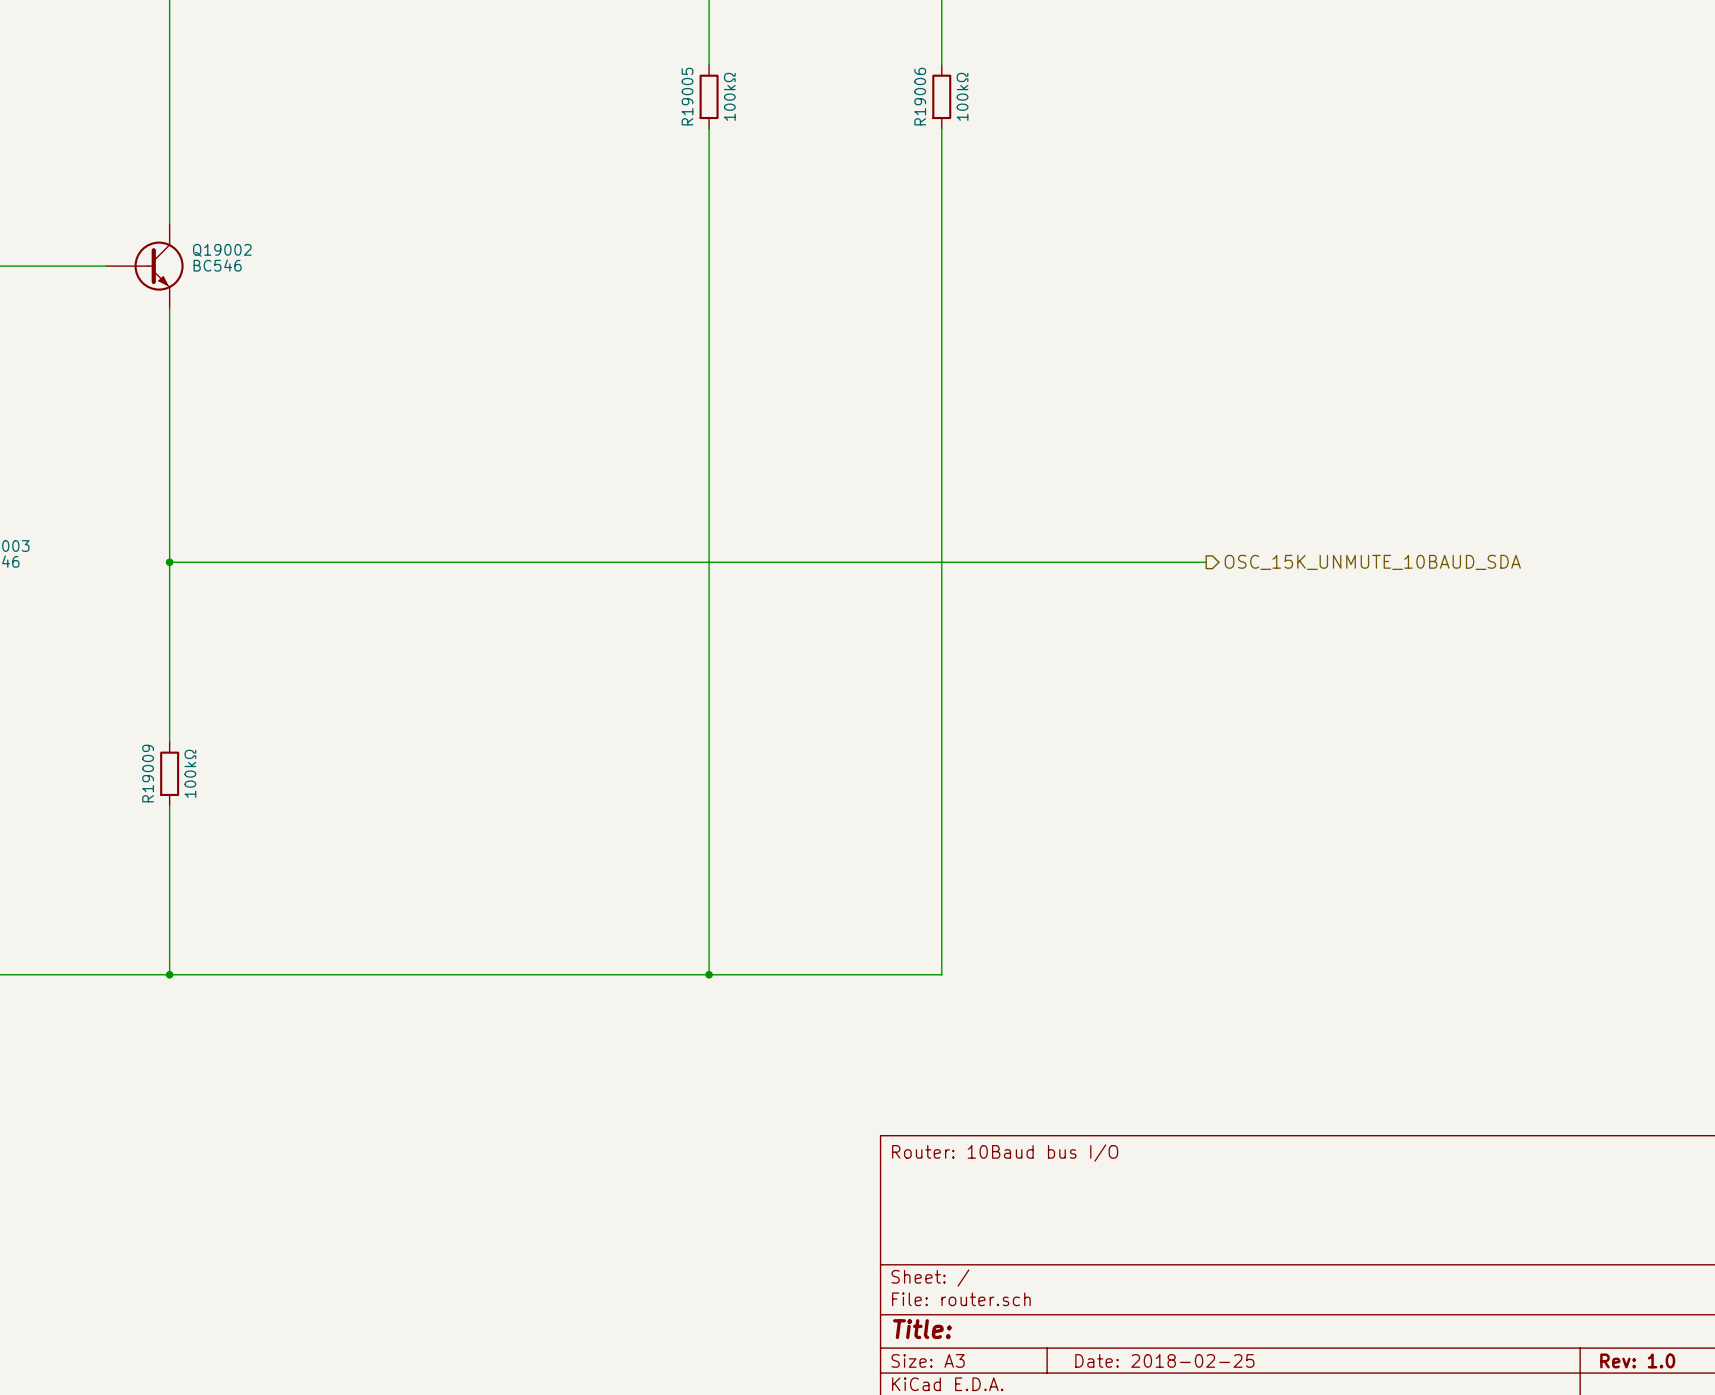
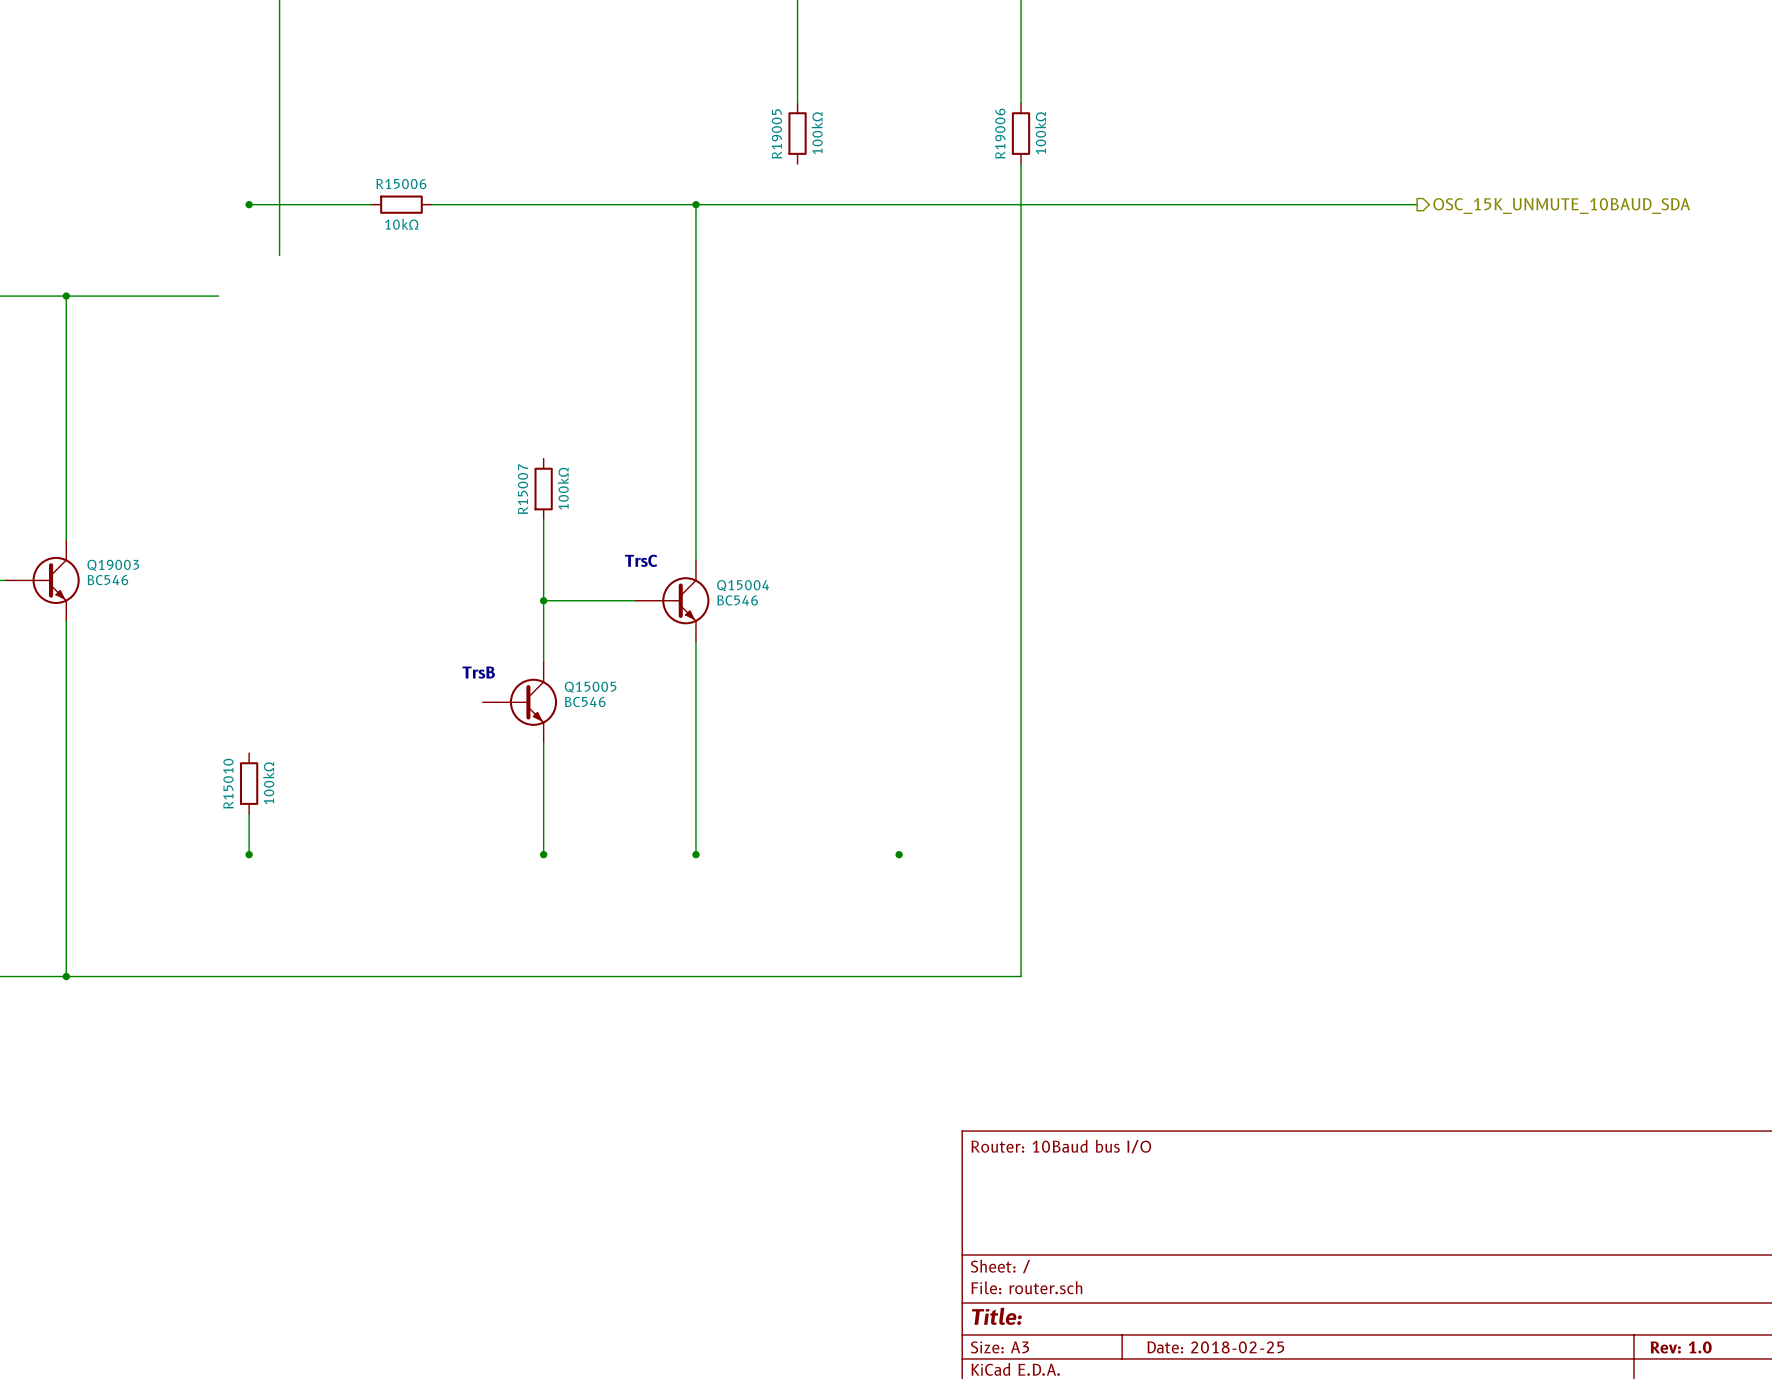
wire: (709, 128) (709, 974) -> none
wire: none -> (249, 204) (370, 204)
junction: none -> (249, 204)
R15006: none -> 10kΩ (401, 204)
wire: none -> (431, 204) (1417, 204)
wire: none -> (695, 204) (695, 560)
junction: none -> (695, 204)
hierarchical label: none -> OSC_15K_UNMUTE_10BAUD_SDA (1561, 206)
Q19002: BC546 (144, 266) -> none
wire: (169, 308) (169, 742) -> none
R15007: none -> 100kΩ (543, 489)
wire: none -> (543, 519) (543, 661)
text: none -> TrsC (641, 560)
wire: (169, 562) (1206, 562) -> none
junction: (169, 562) -> none
hierarchical label: OSC_15K_UNMUTE_10BAUD_SDA (1372, 562) -> none
wire: none -> (543, 600) (635, 600)
junction: none -> (543, 600)
Q15004: none -> BC546 (672, 600)
wire: none -> (695, 641) (695, 854)
text: none -> TrsB (478, 672)
Q15005: none -> BC546 (519, 702)
wire: none -> (543, 742) (543, 854)
R15010: none -> 100kΩ (249, 783)
R19009: 100kΩ (169, 773) -> none
wire: none -> (249, 814) (249, 854)
wire: (169, 805) (169, 974) -> none
junction: none -> (249, 854)
junction: none -> (543, 854)
junction: none -> (695, 854)
junction: none -> (899, 854)
junction: (169, 974) -> none
junction: (709, 974) -> none

